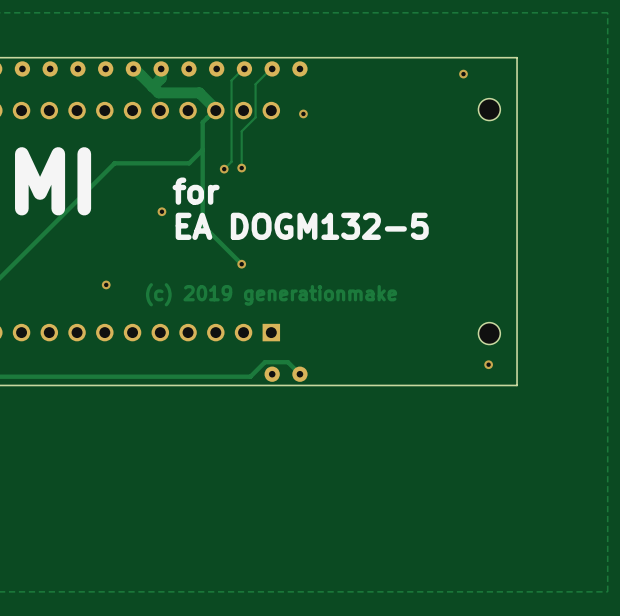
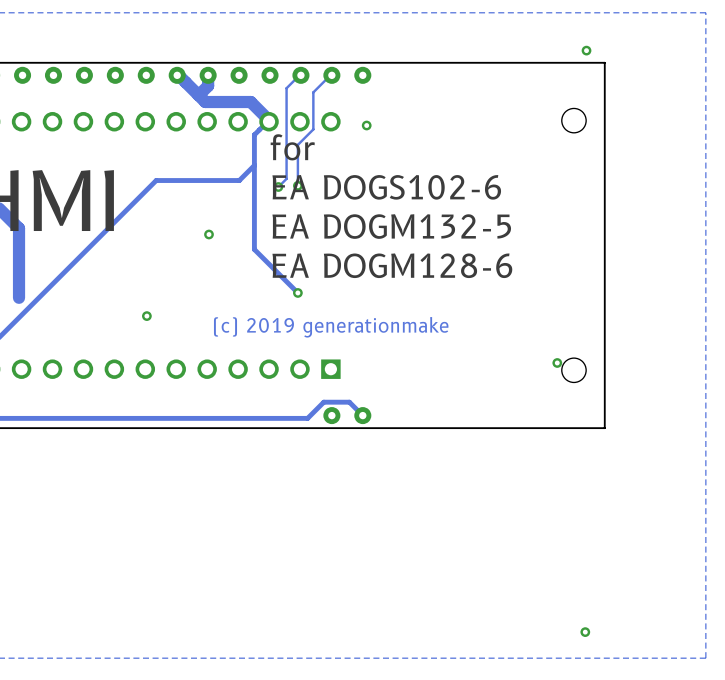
via position: (463, 74) -> (586, 50)
text: none -> EA DOGS102-6 (386, 187)
text position: for (196, 191) -> for (292, 147)
text position: EA DOGM132-5 (302, 226) -> EA DOGM132-5 (391, 226)
text: none -> EA DOGM128-6 (392, 265)
via position: (488, 364) -> (557, 362)
via: none -> (585, 632)

